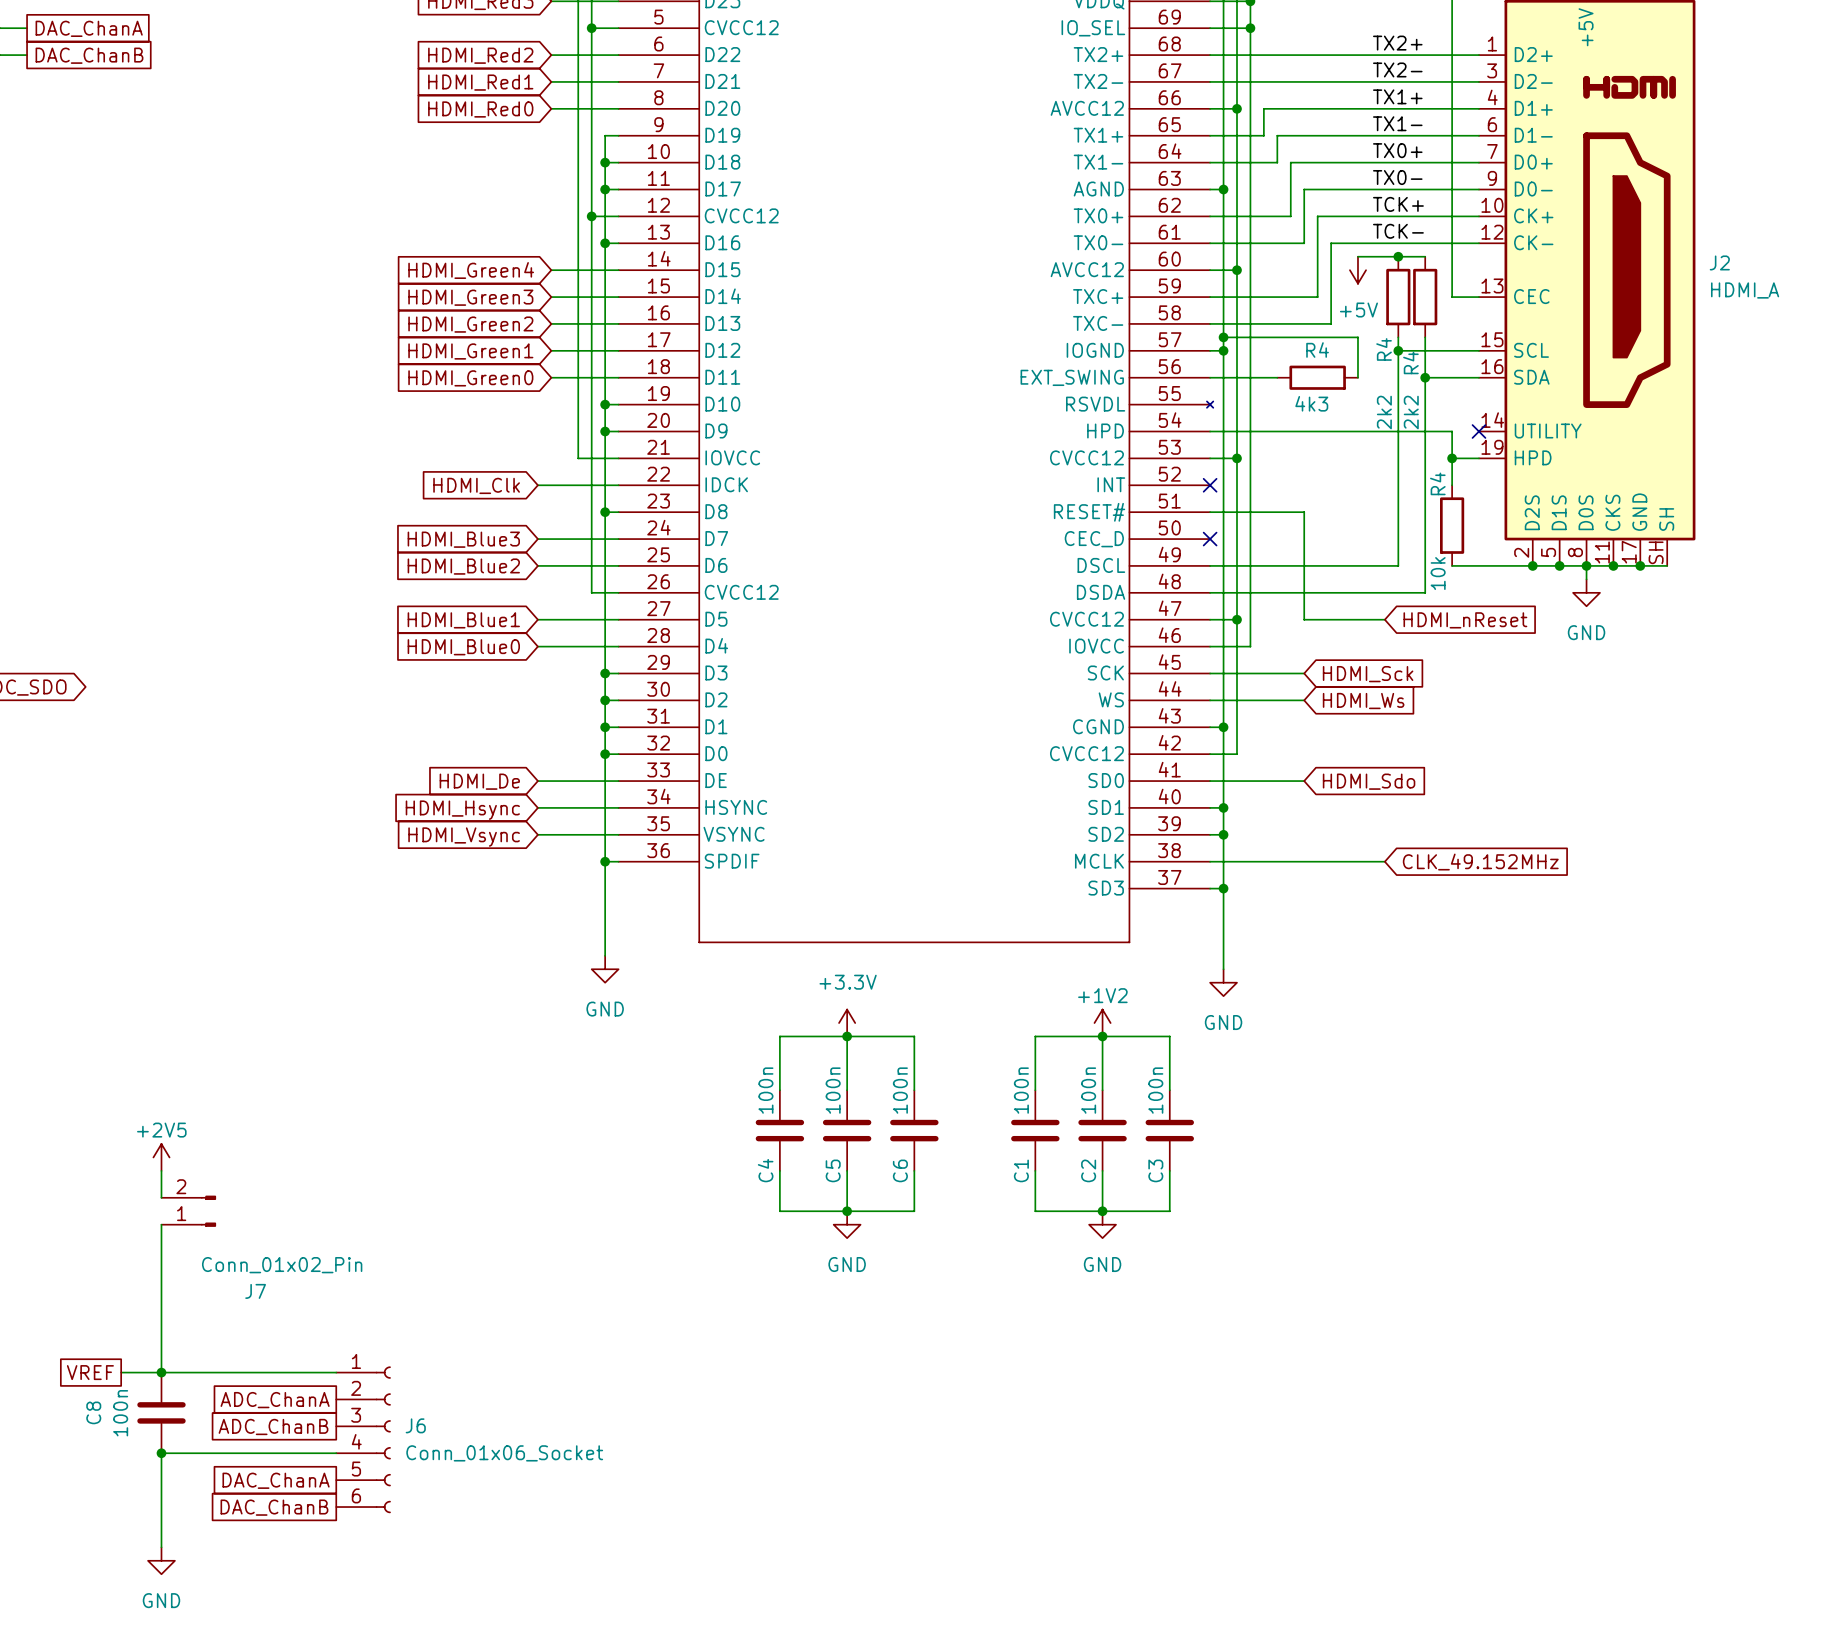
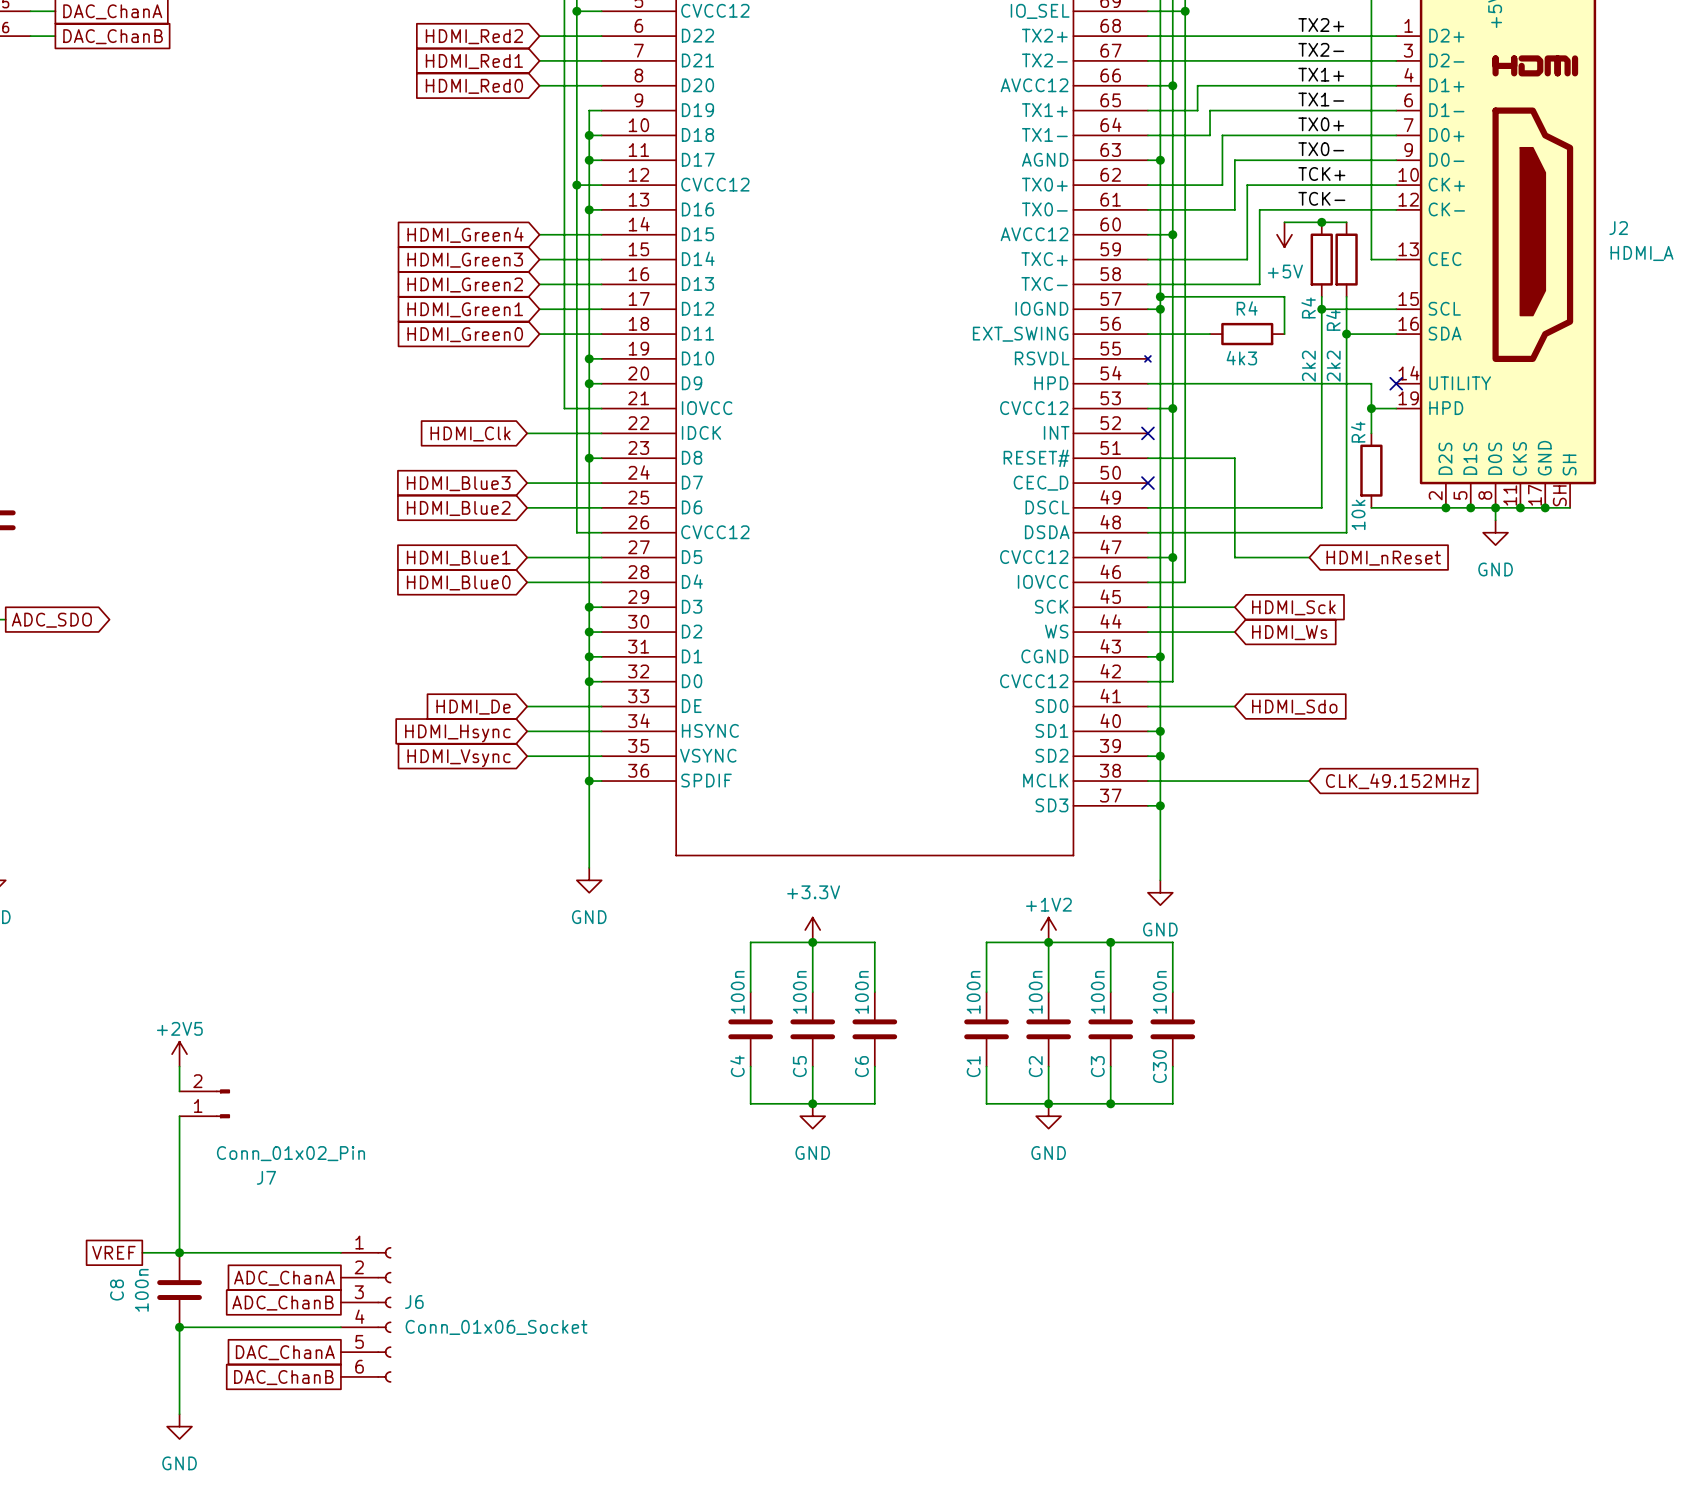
wire: none -> (1110, 942) (1172, 942) (1172, 992)
junction: none -> (1110, 942)
C30: none -> 100n (1172, 1029)
wire: none -> (1172, 1066) (1172, 1103) (1110, 1103)
junction: none -> (1110, 1103)

